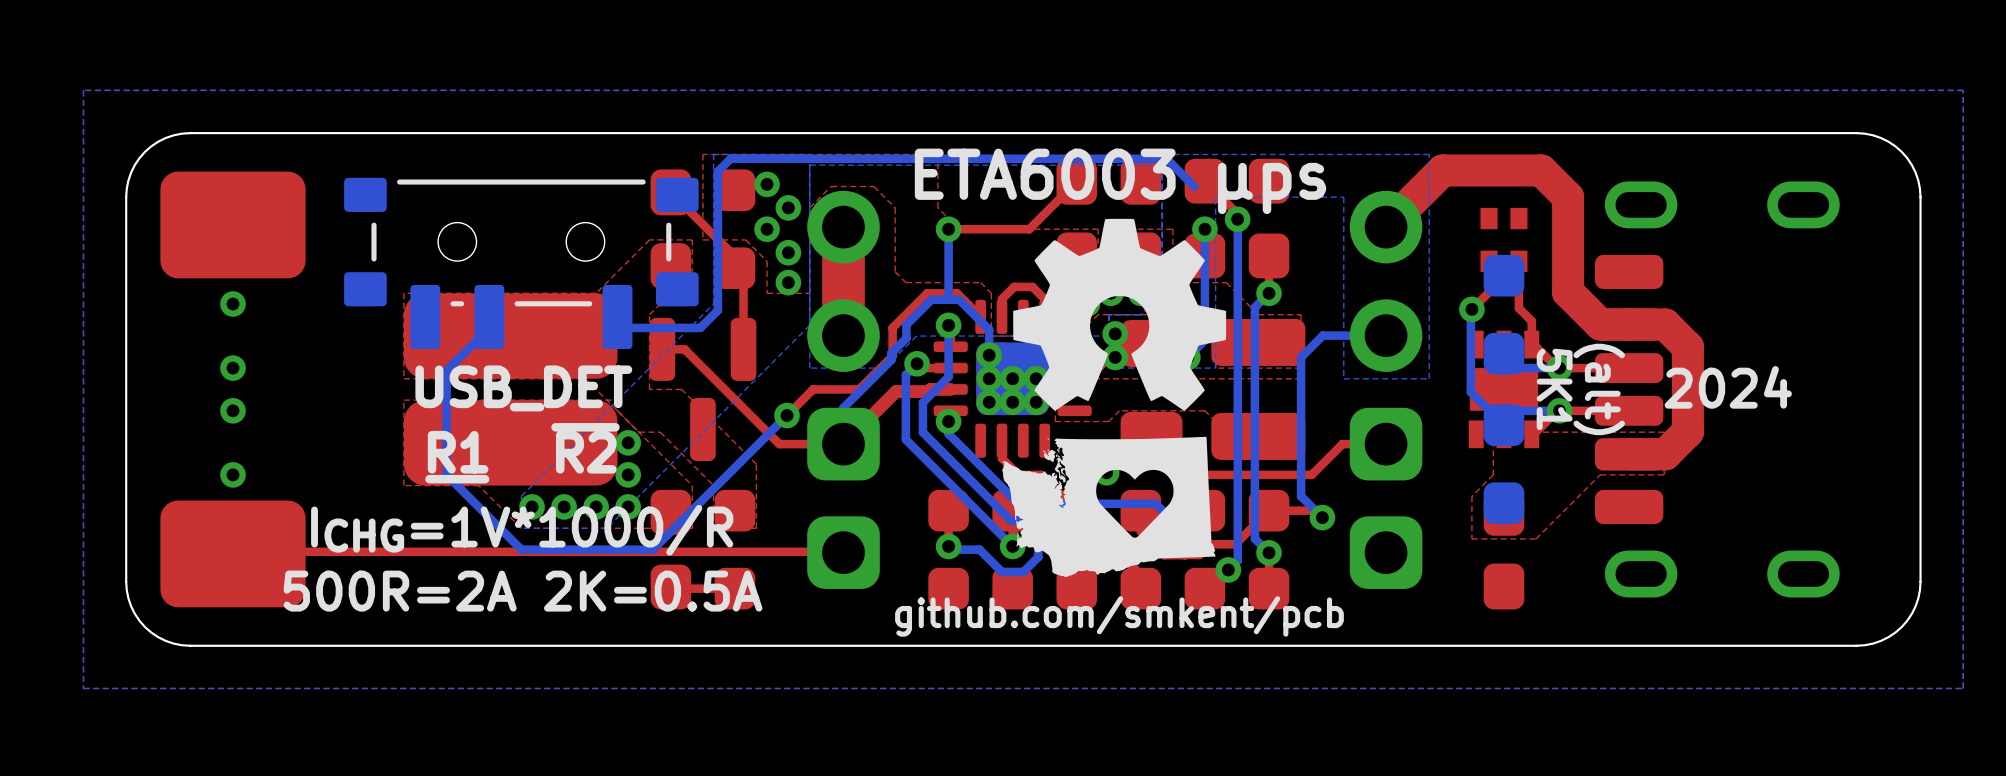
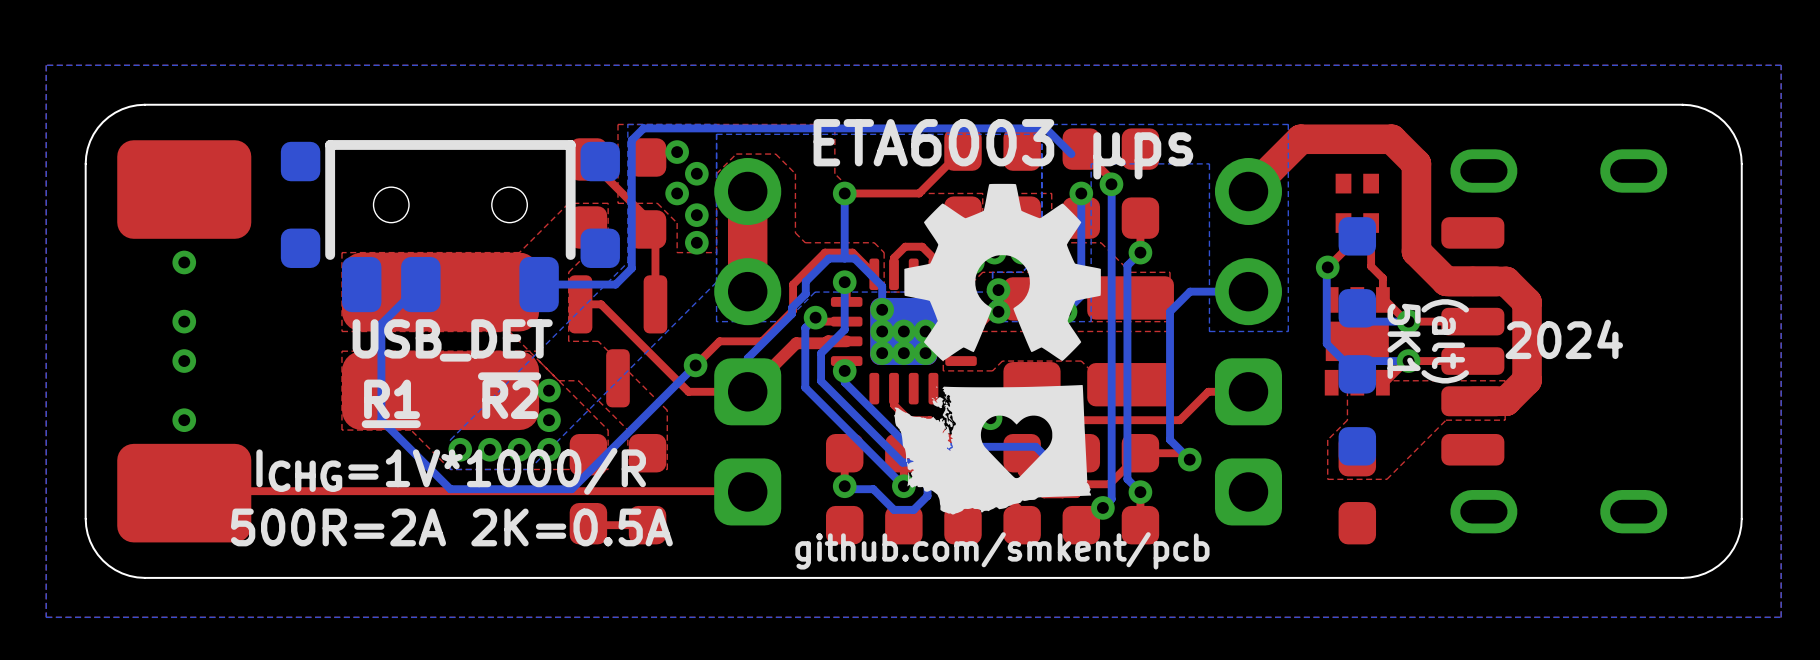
part footprint: [344, 177, 699, 350] -> [280, 140, 620, 313]

